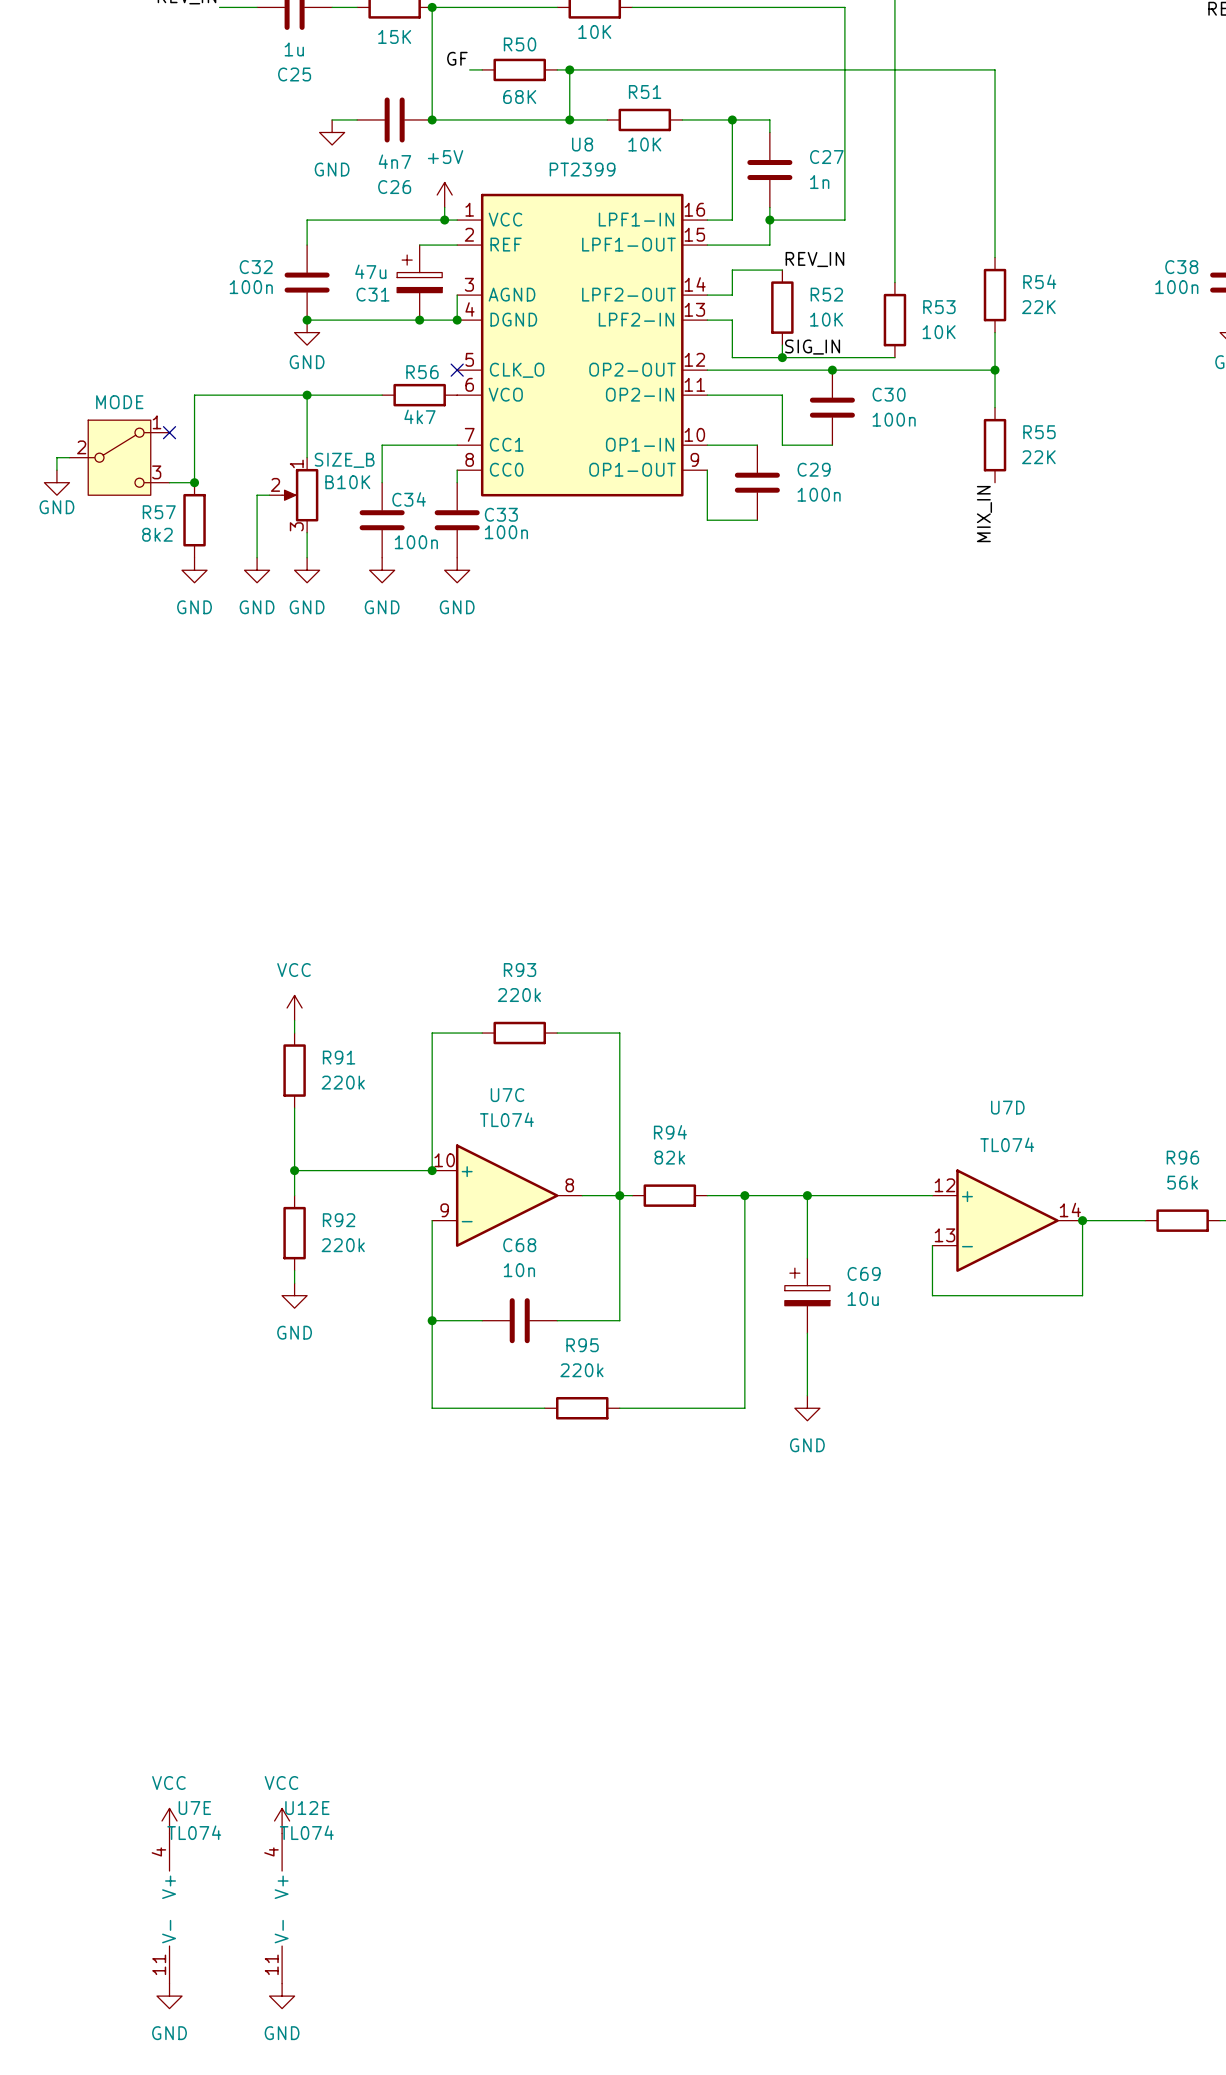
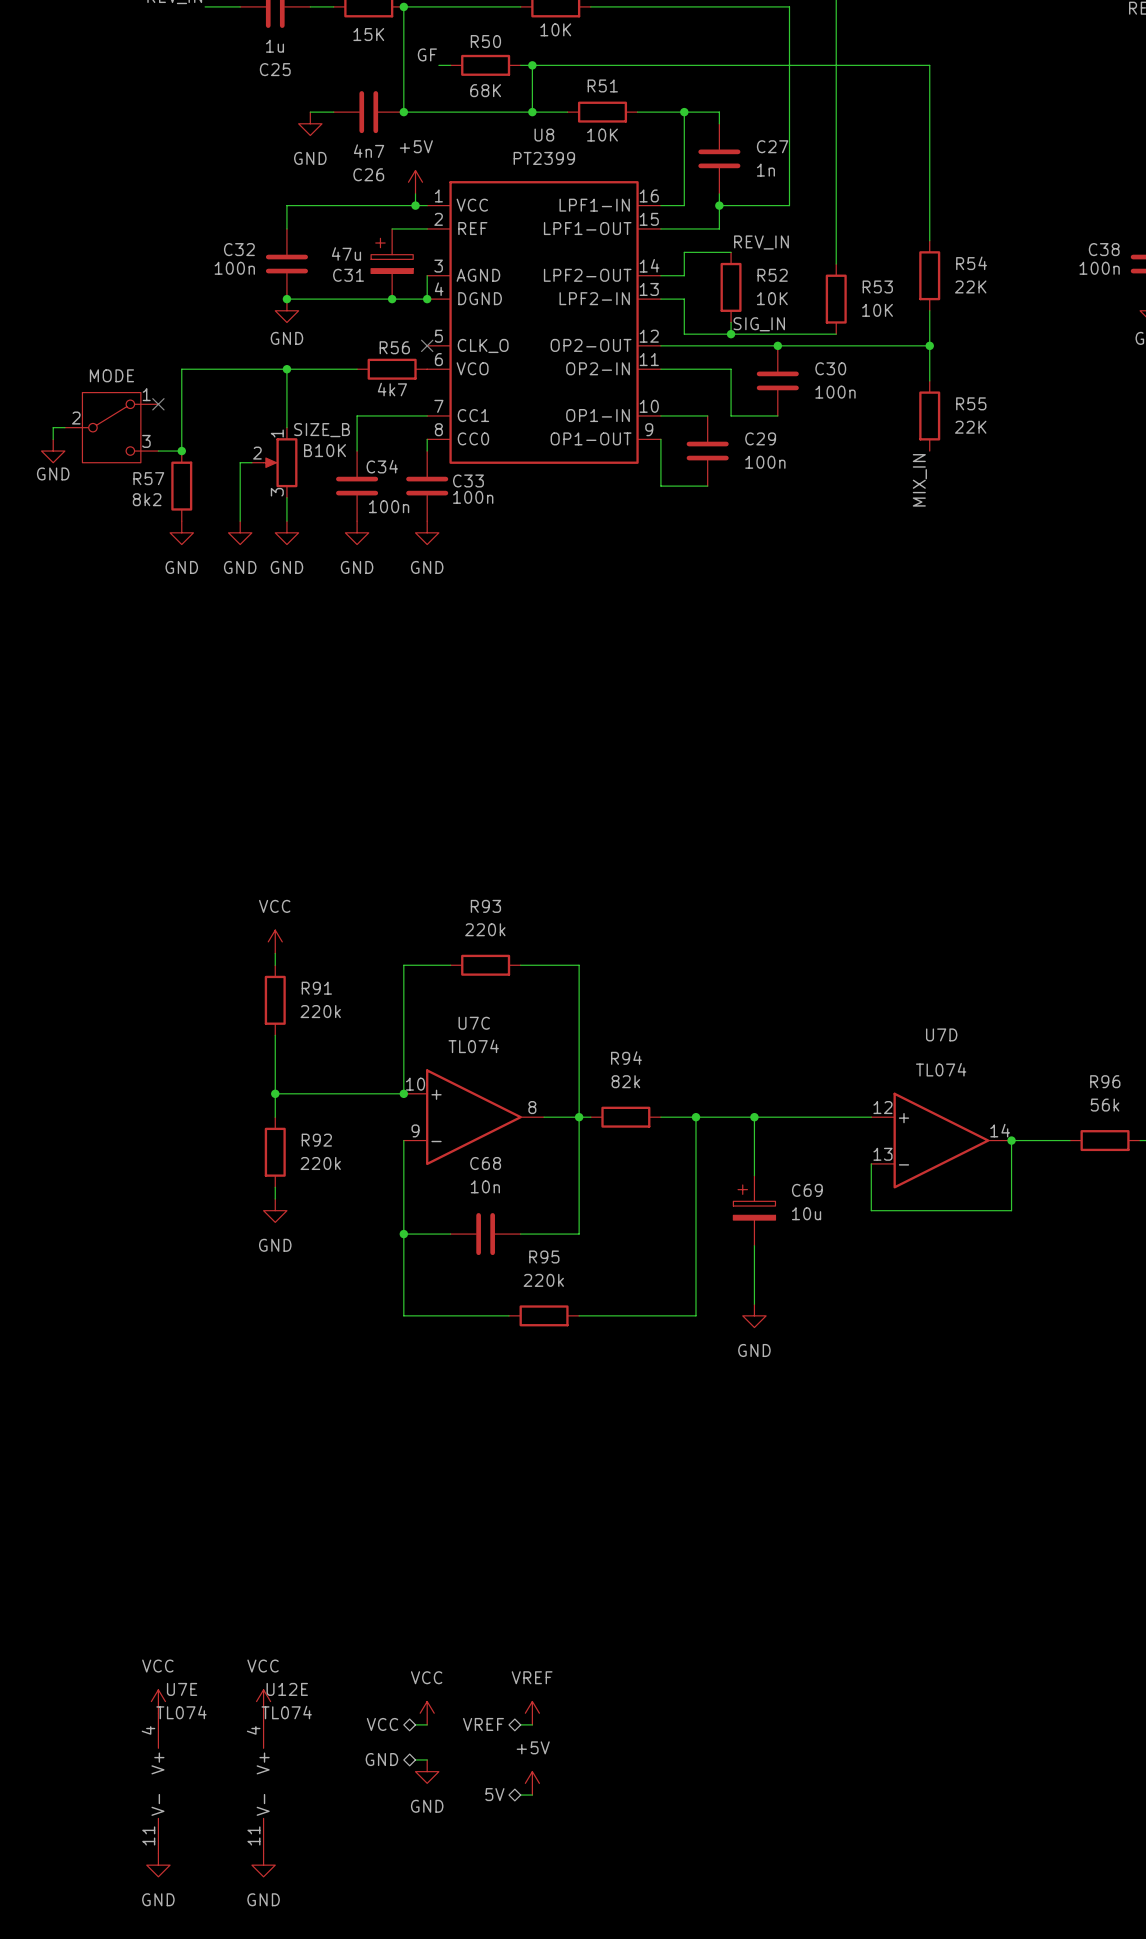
power symbol: none -> VCC (427, 1713)
power symbol: none -> VREF (532, 1713)
hierarchical label: none -> VCC (382, 1724)
hierarchical label: none -> VREF (483, 1724)
wire: none -> (415, 1724) (427, 1724)
wire: none -> (520, 1724) (532, 1724)
hierarchical label: none -> GND (381, 1759)
wire: none -> (415, 1759) (427, 1759)
power symbol: none -> GND (427, 1771)
power symbol: none -> +5V (532, 1783)
hierarchical label: none -> 5V (494, 1794)
wire: none -> (520, 1795) (532, 1795)

